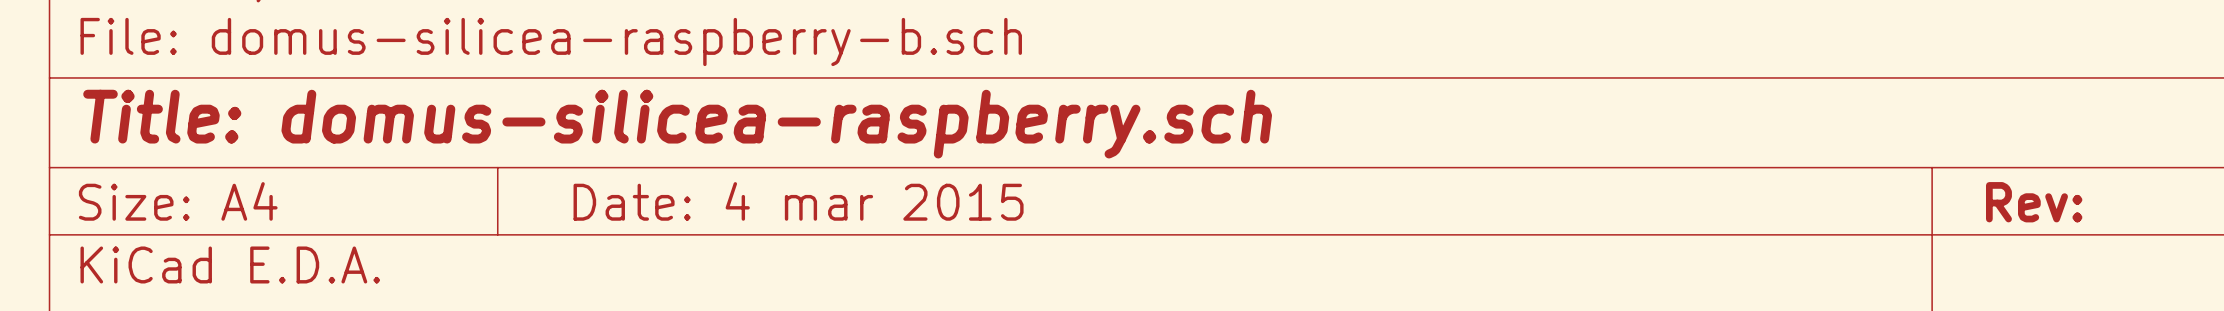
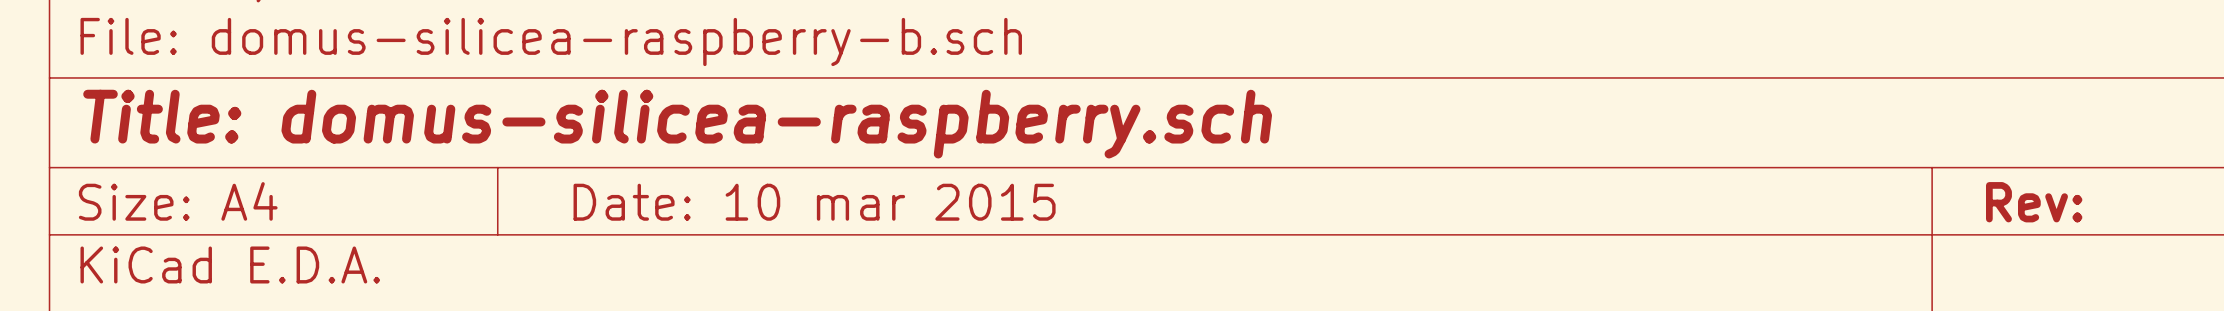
title block: Date: 4 mar 2015 (798, 201) -> Date: 10 mar 2015 (814, 202)

